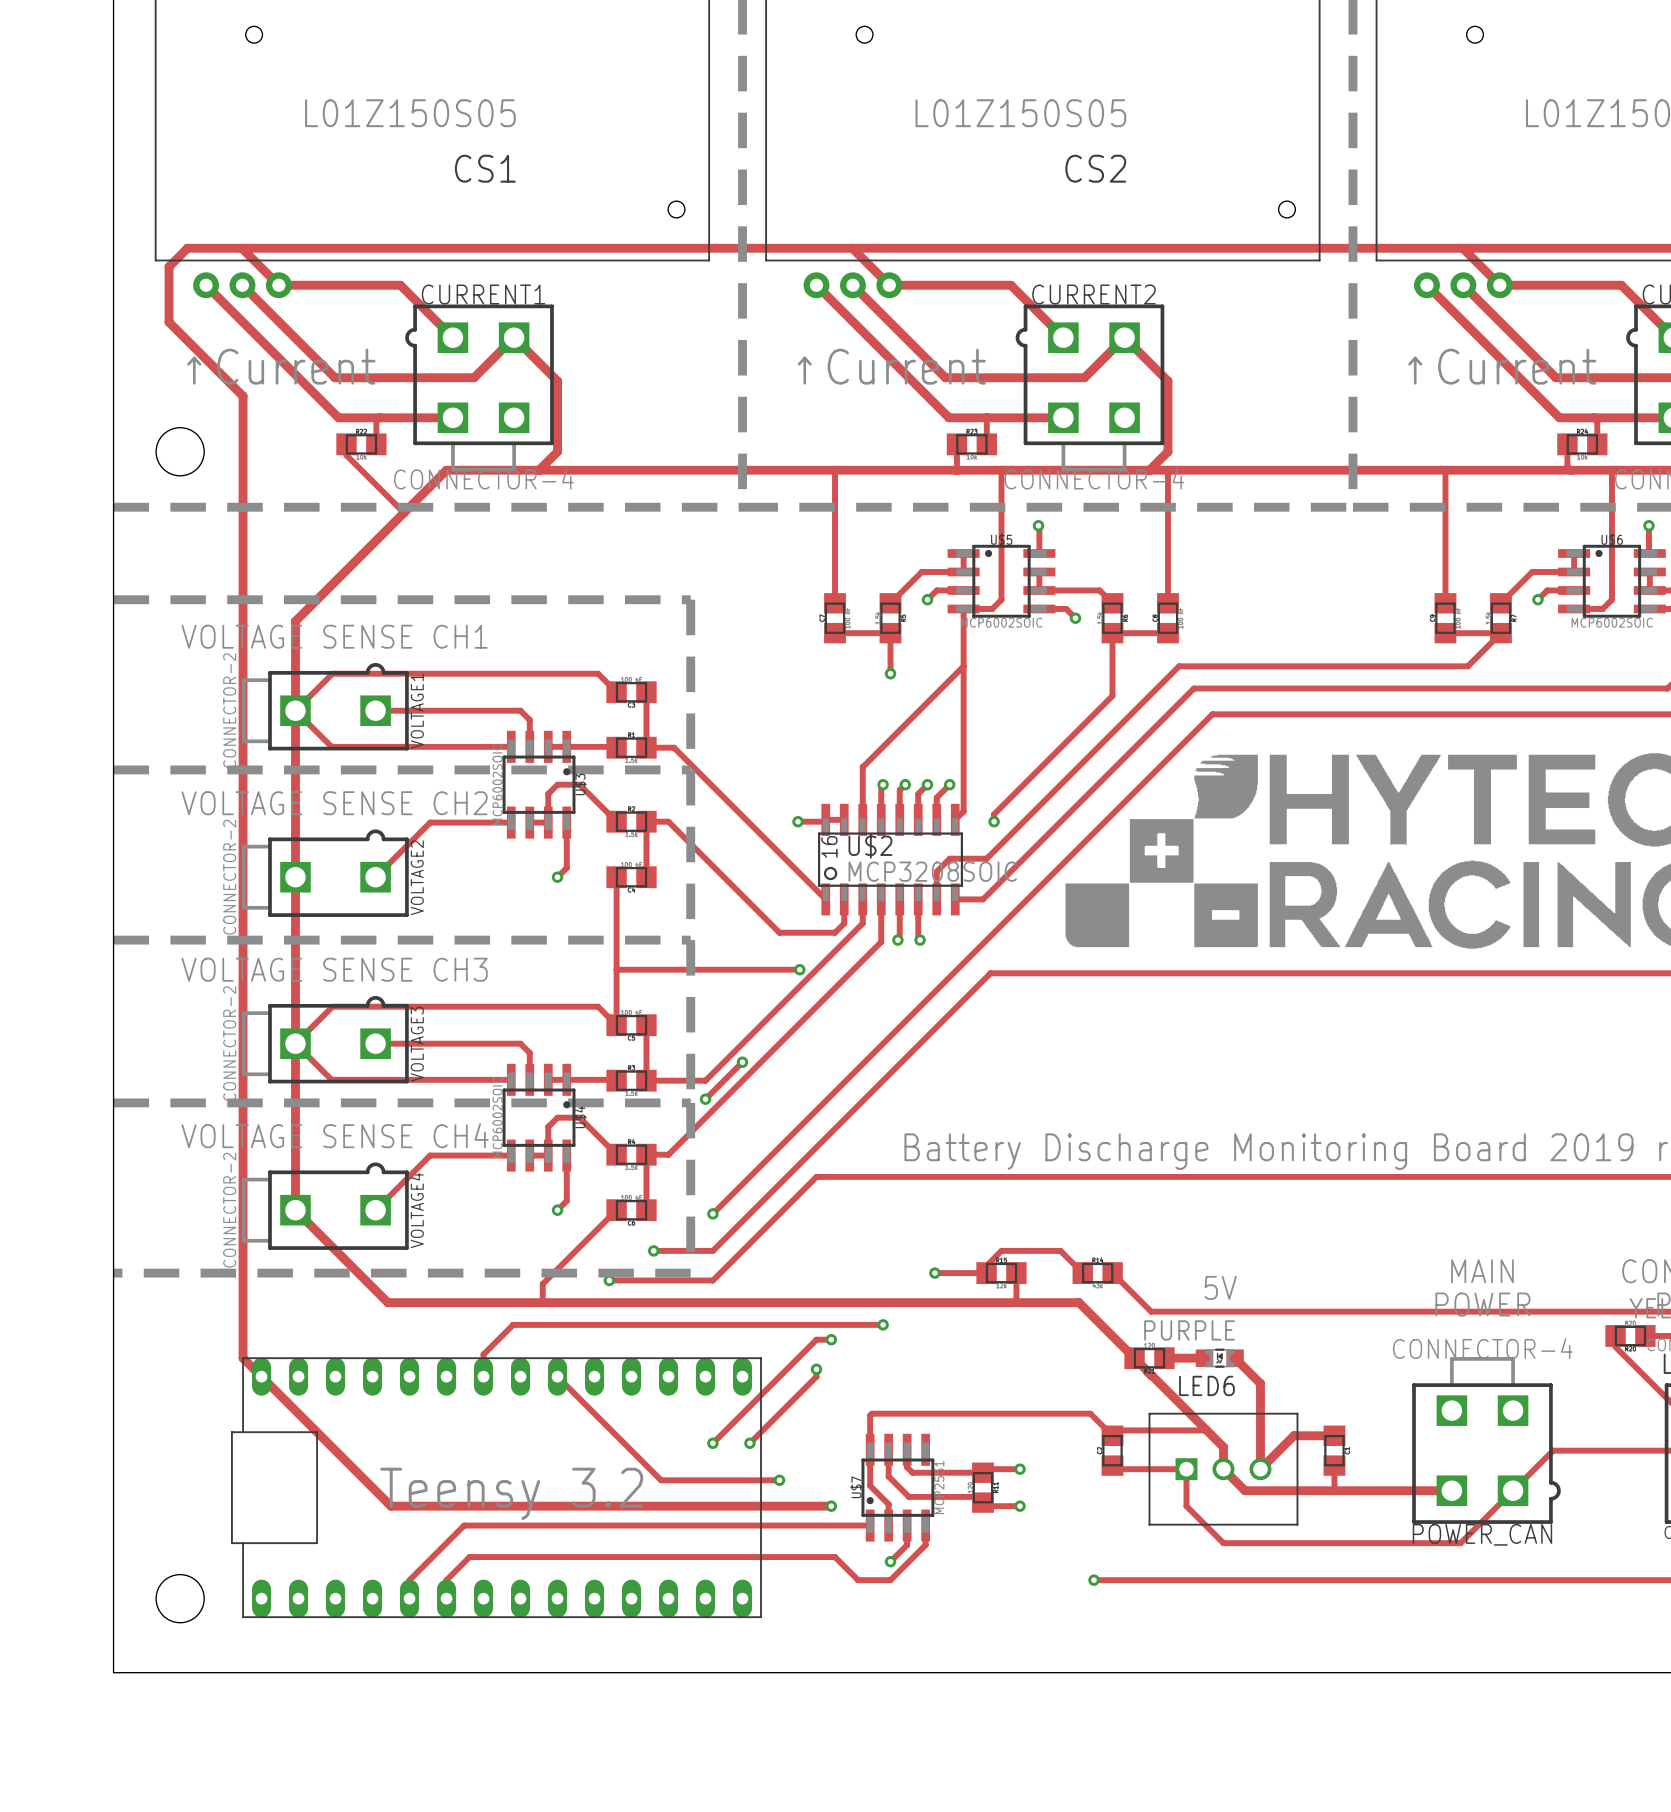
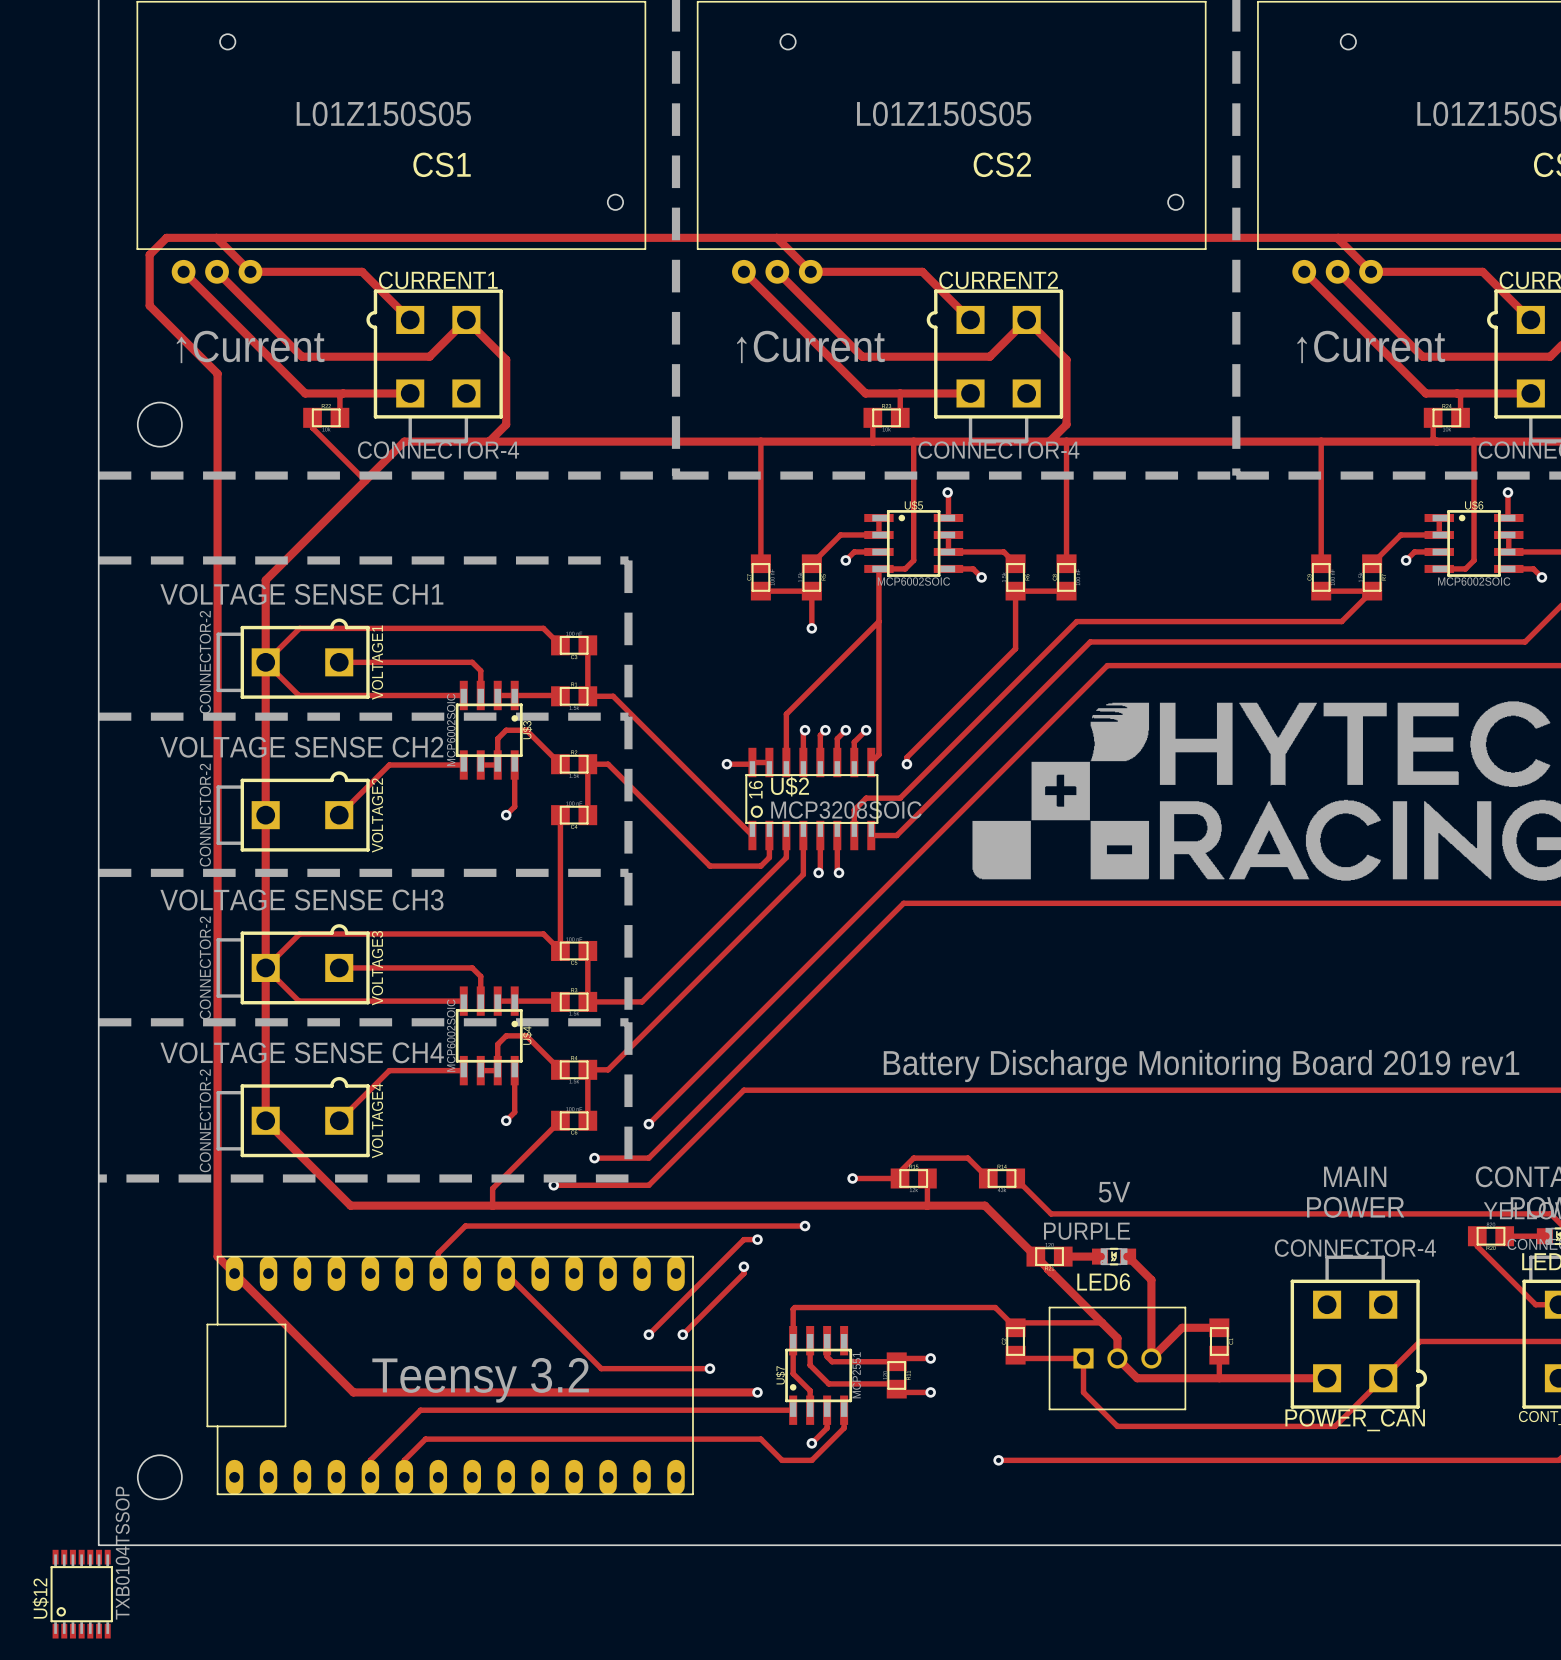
track: (616, 969) (799, 969) -> none
via: (799, 969) -> none
track: (742, 1062) (705, 1099) -> none
via: (742, 1062) -> none
via: (705, 1099) -> none
U$12: none -> TXB0104TSSOP (81, 1594)

